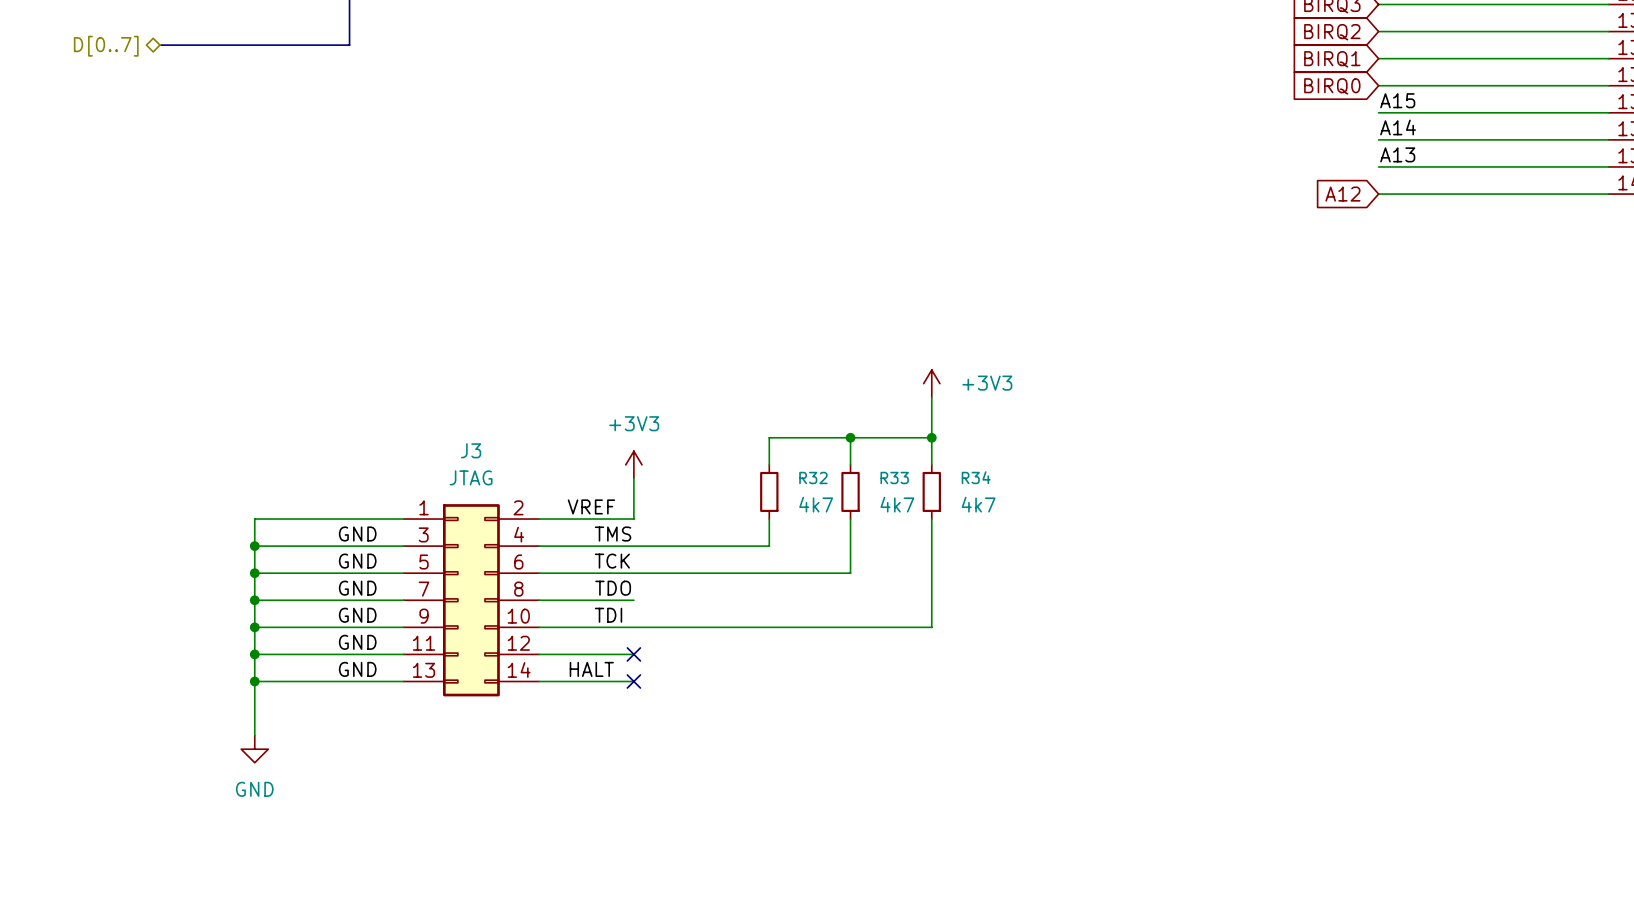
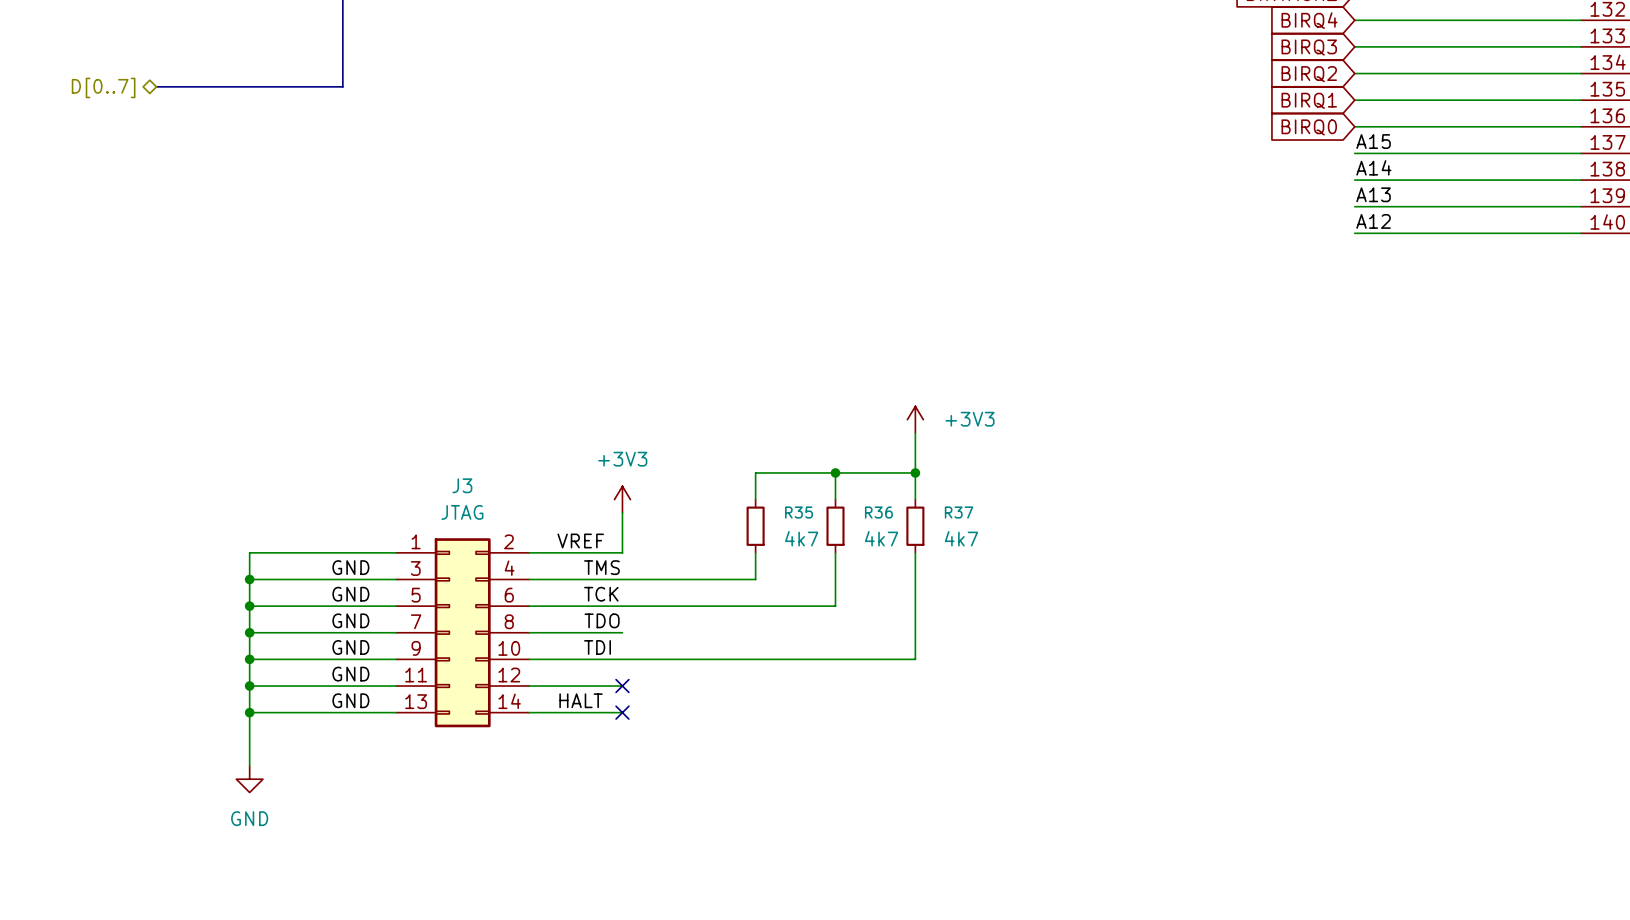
label: none -> A12 (1373, 221)
global label: A12 (1342, 194) -> none
R32 name: R32 (813, 477) -> R35 (799, 512)
R33 name: R33 (894, 477) -> R36 (878, 512)
R34 name: R34 (976, 477) -> R37 (959, 512)

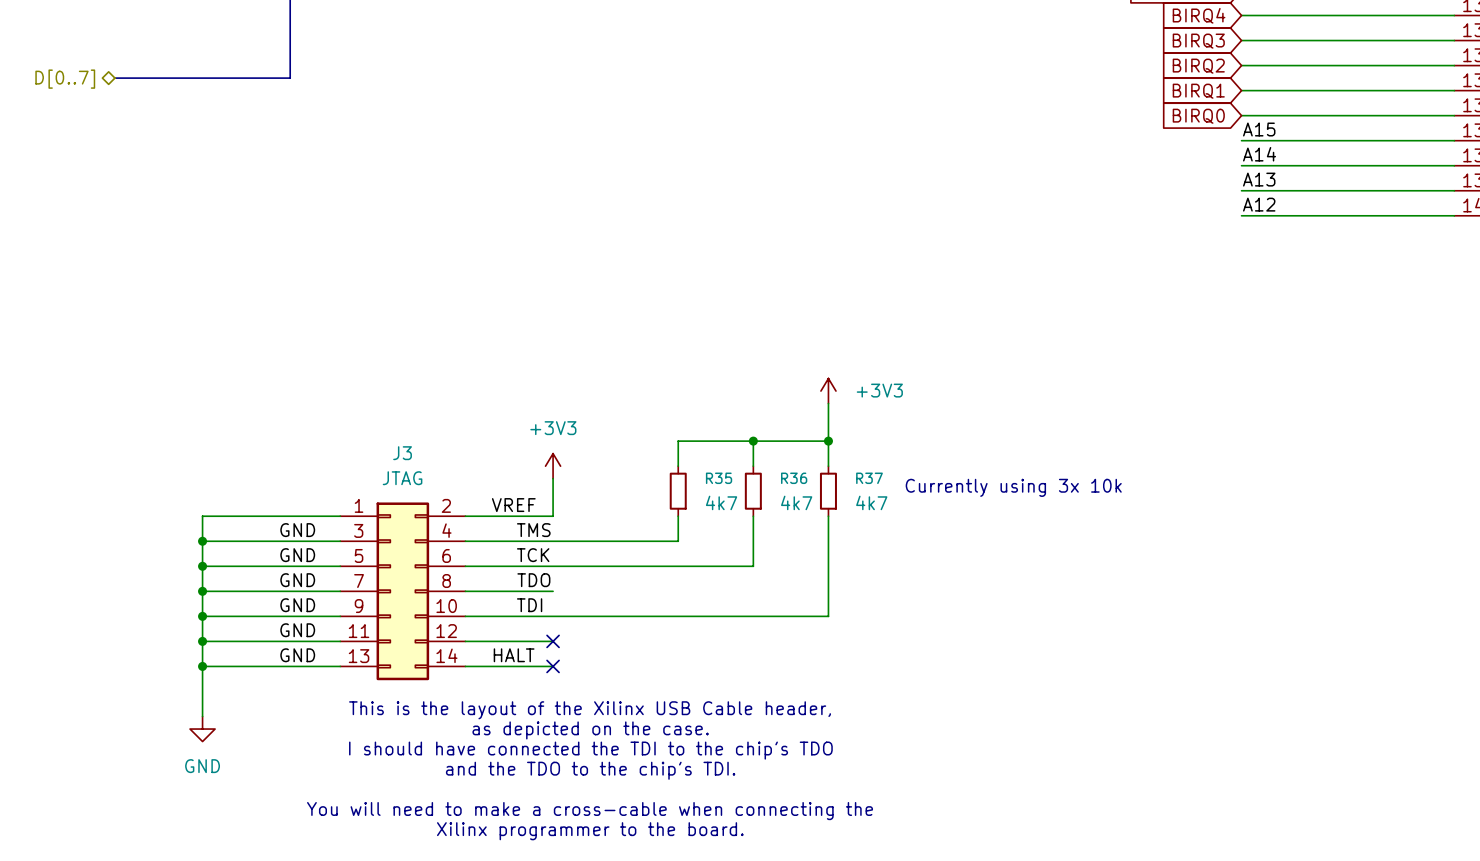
text: none -> Currently using 3x 10k (1013, 487)
text: none -> This is the layout of the Xilinx USB Cable header, (590, 710)
text: none -> as depicted on the case. (590, 730)
text: none -> I should have connected the TDI to the chip's TDO (590, 750)
text: none -> and the TDO to the chip's TDI. (590, 770)
text: none -> You will need to make a cross-cable when connecting the (590, 811)
text: none -> Xilinx programmer to the board. (590, 831)

